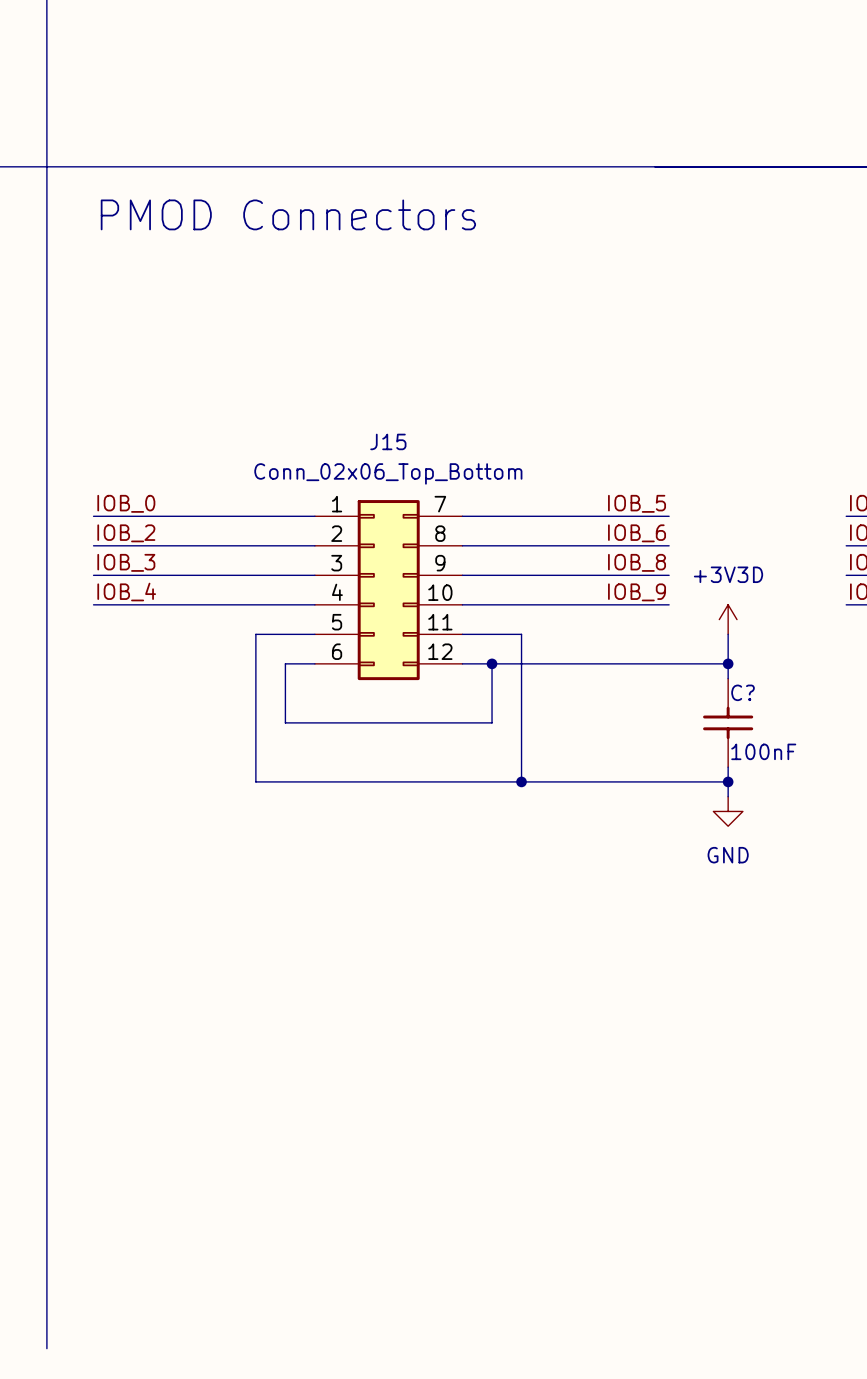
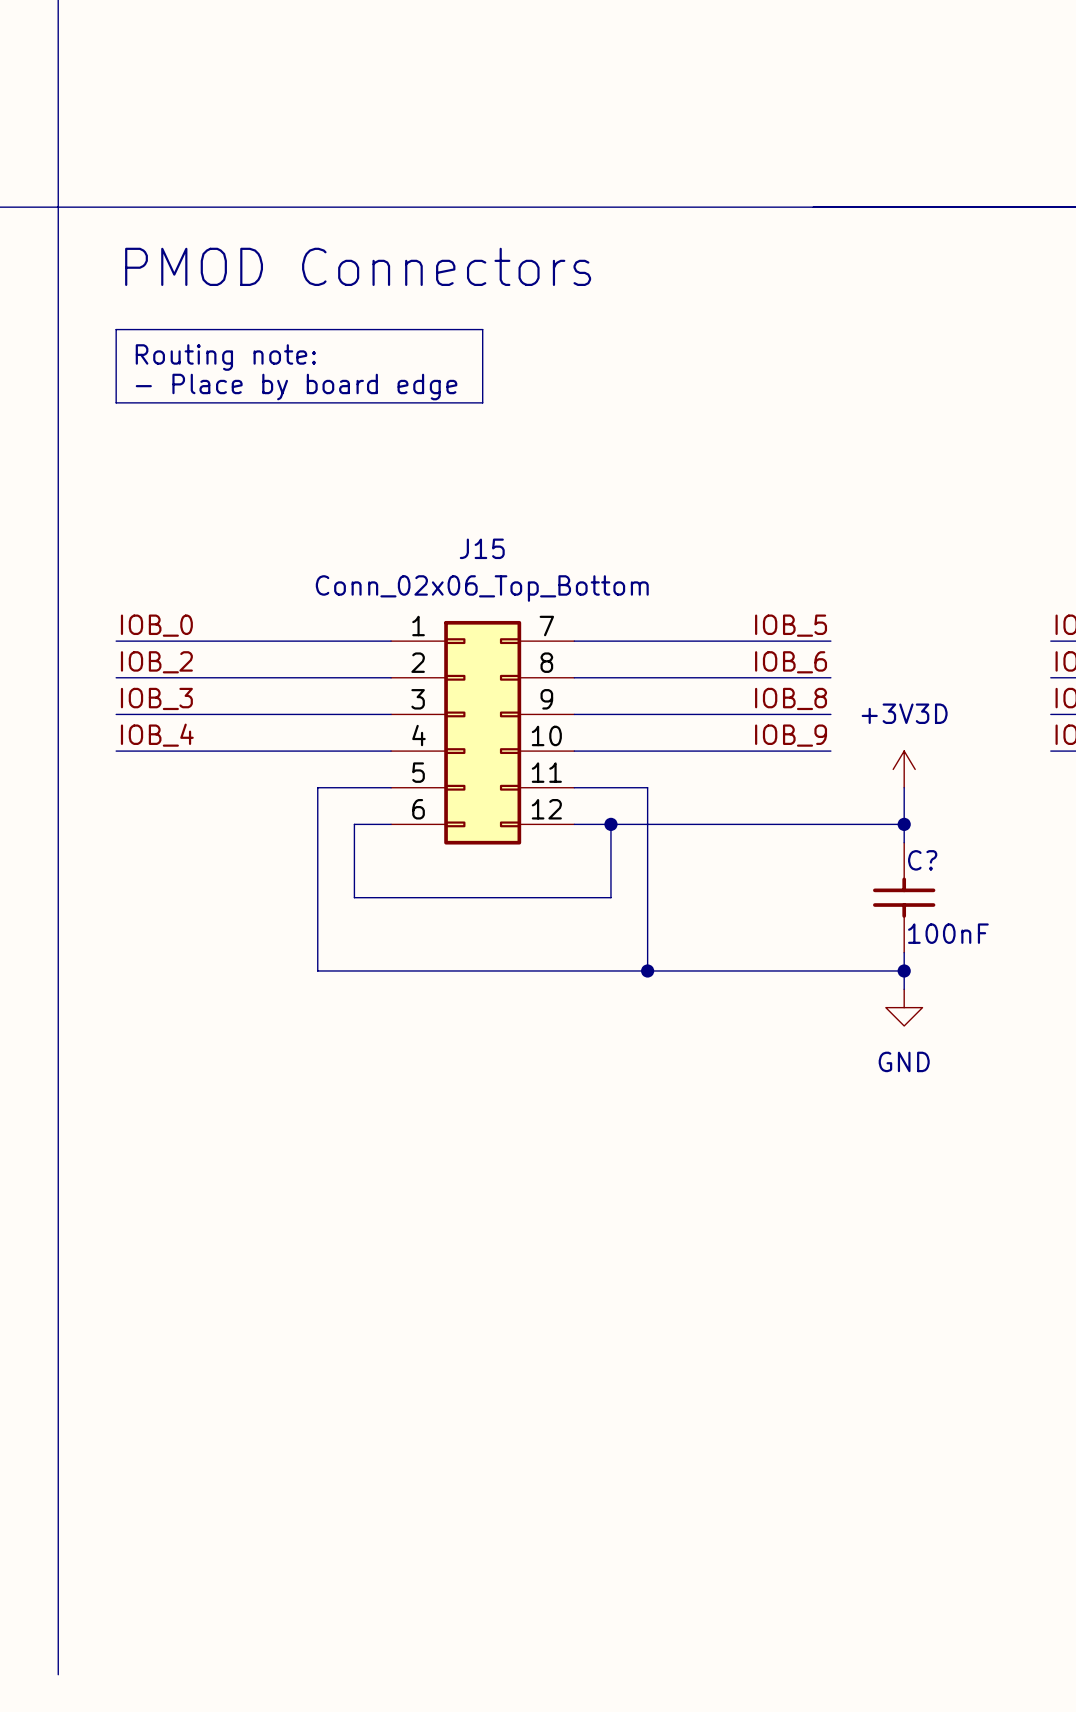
line: none -> (116, 329) (482, 329) (482, 402) (116, 402) (116, 329)
text: none -> Routing note: (225, 357)
text: none -> - Place by board edge (296, 387)

